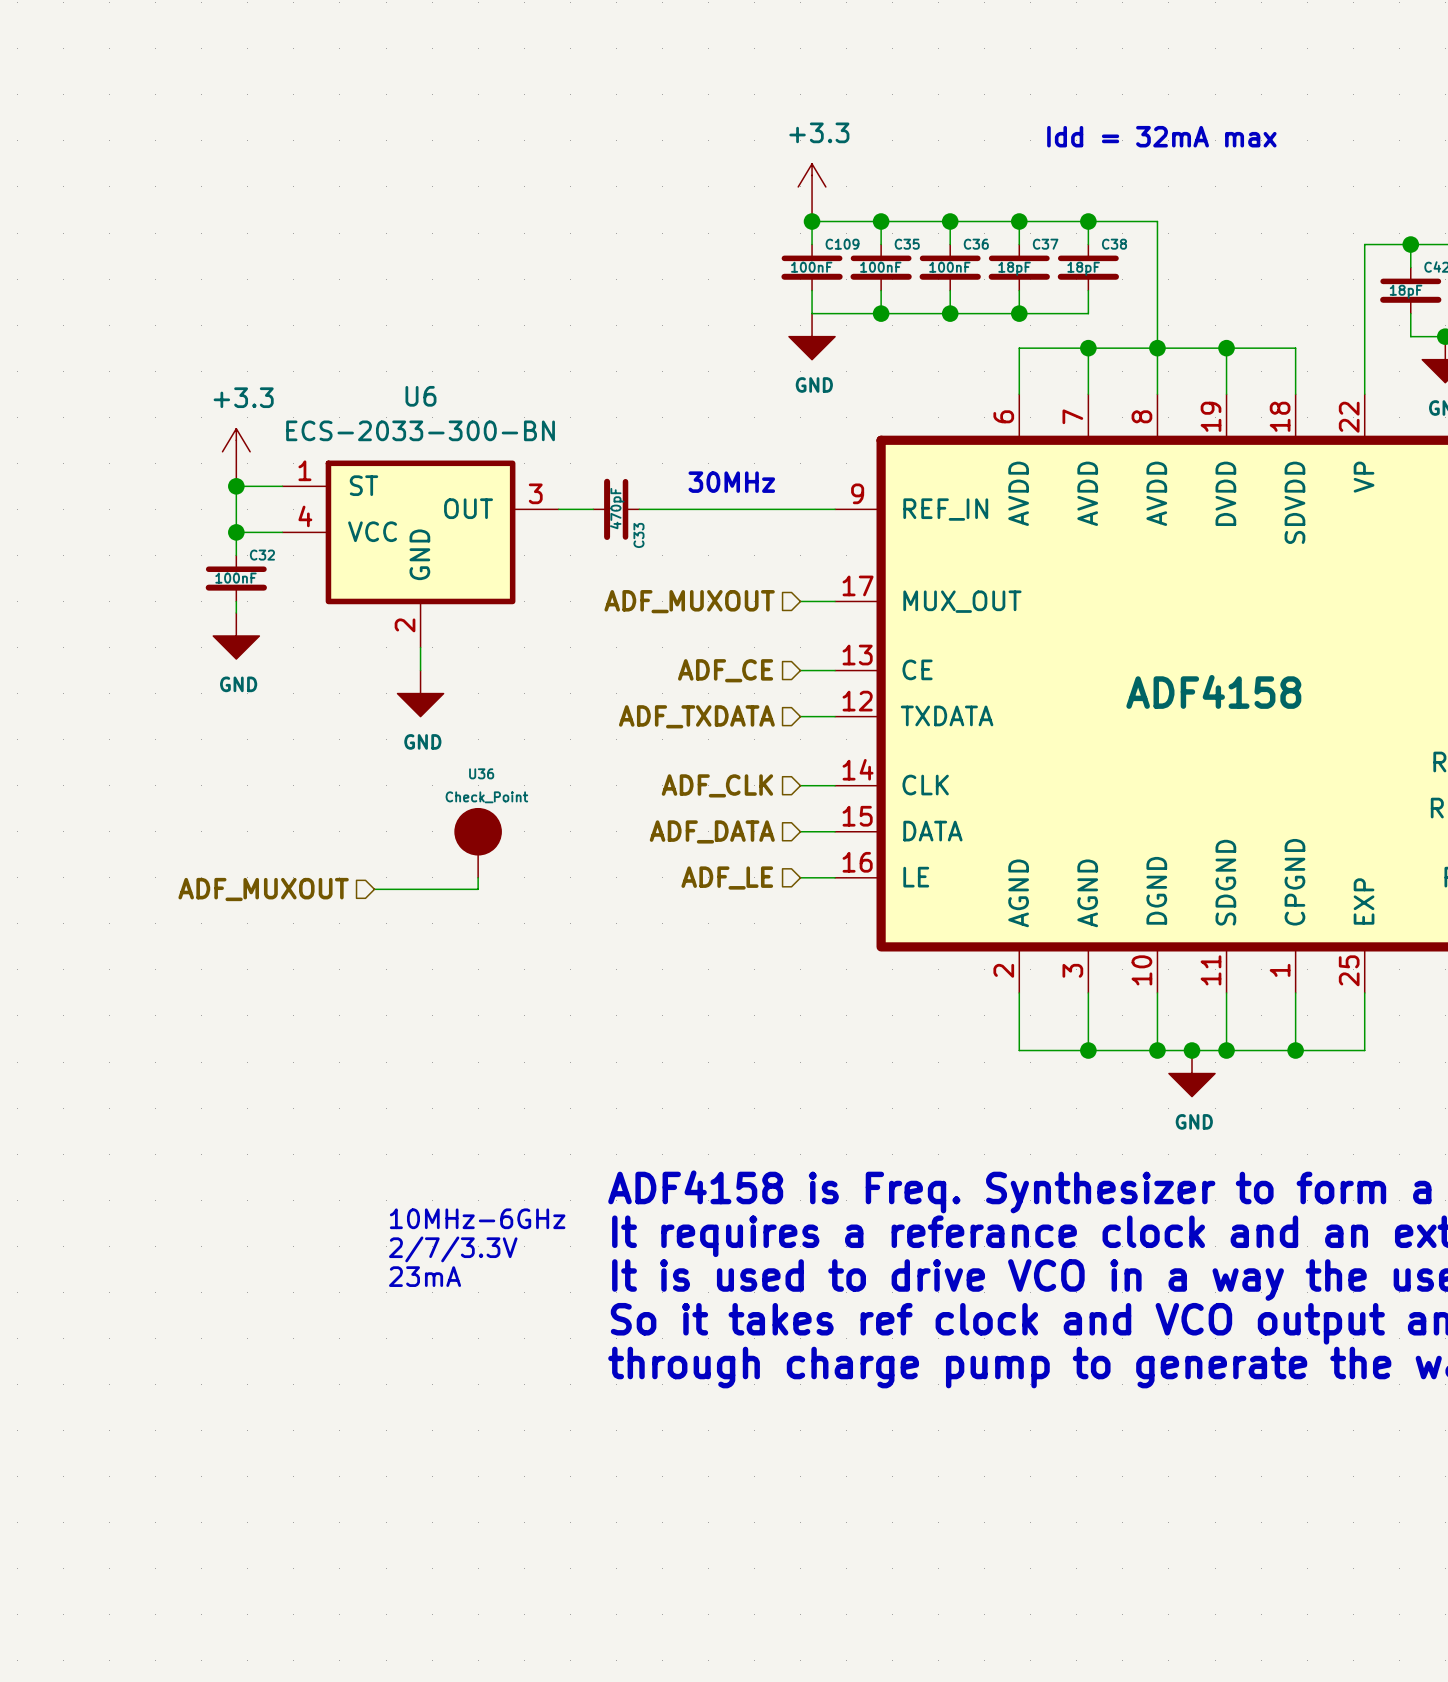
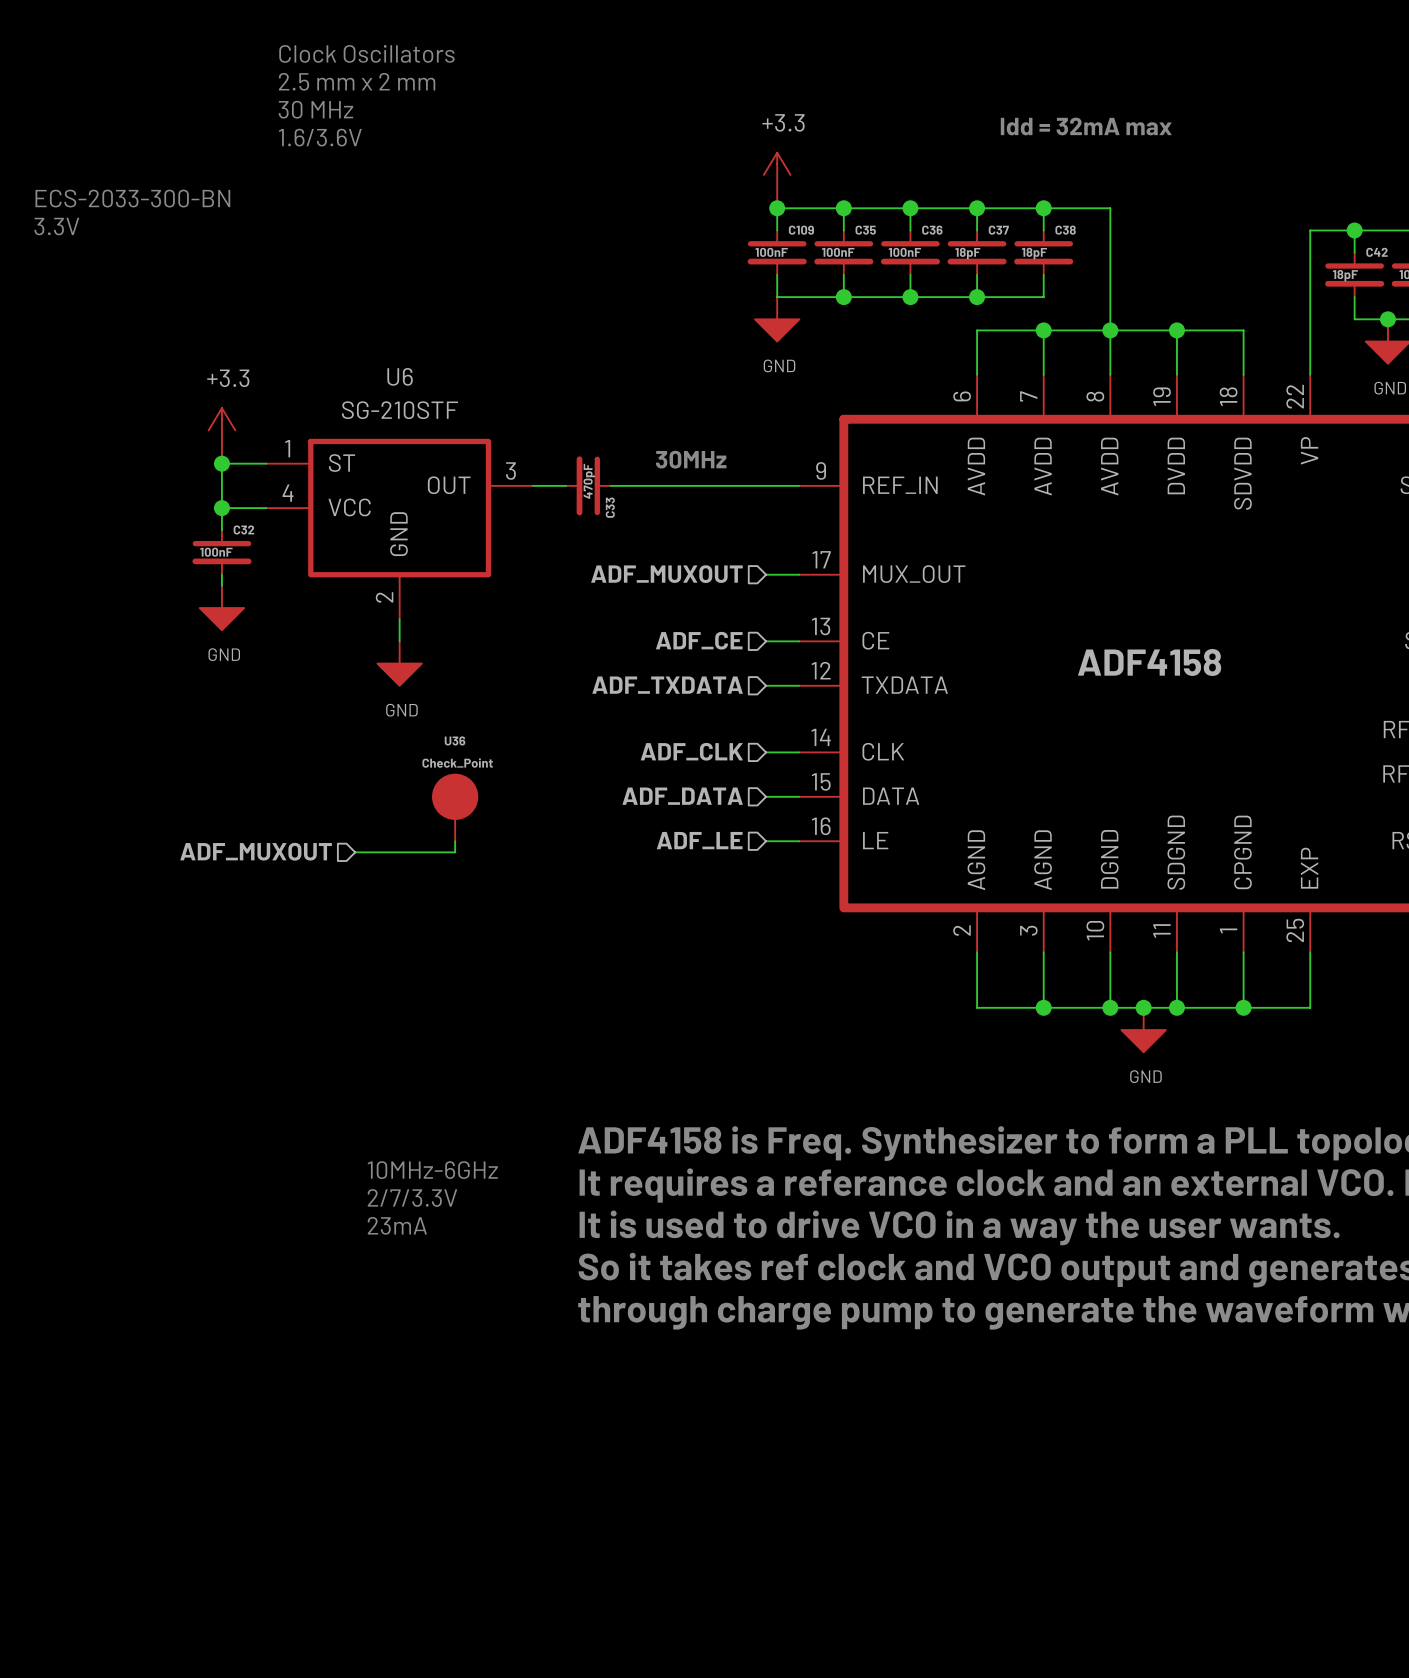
text: none -> Clock Oscillators (366, 53)
text: none -> 2.5 mm x 2 mm (357, 81)
text: none -> 30 MHz (315, 109)
text: none -> 1.6/3.6V (320, 137)
text: none -> ECS-2033-300-BN (132, 198)
text: none -> 3.3V (56, 226)
U6 value: ECS-2033-300-BN (420, 430) -> SG-210STF (400, 410)

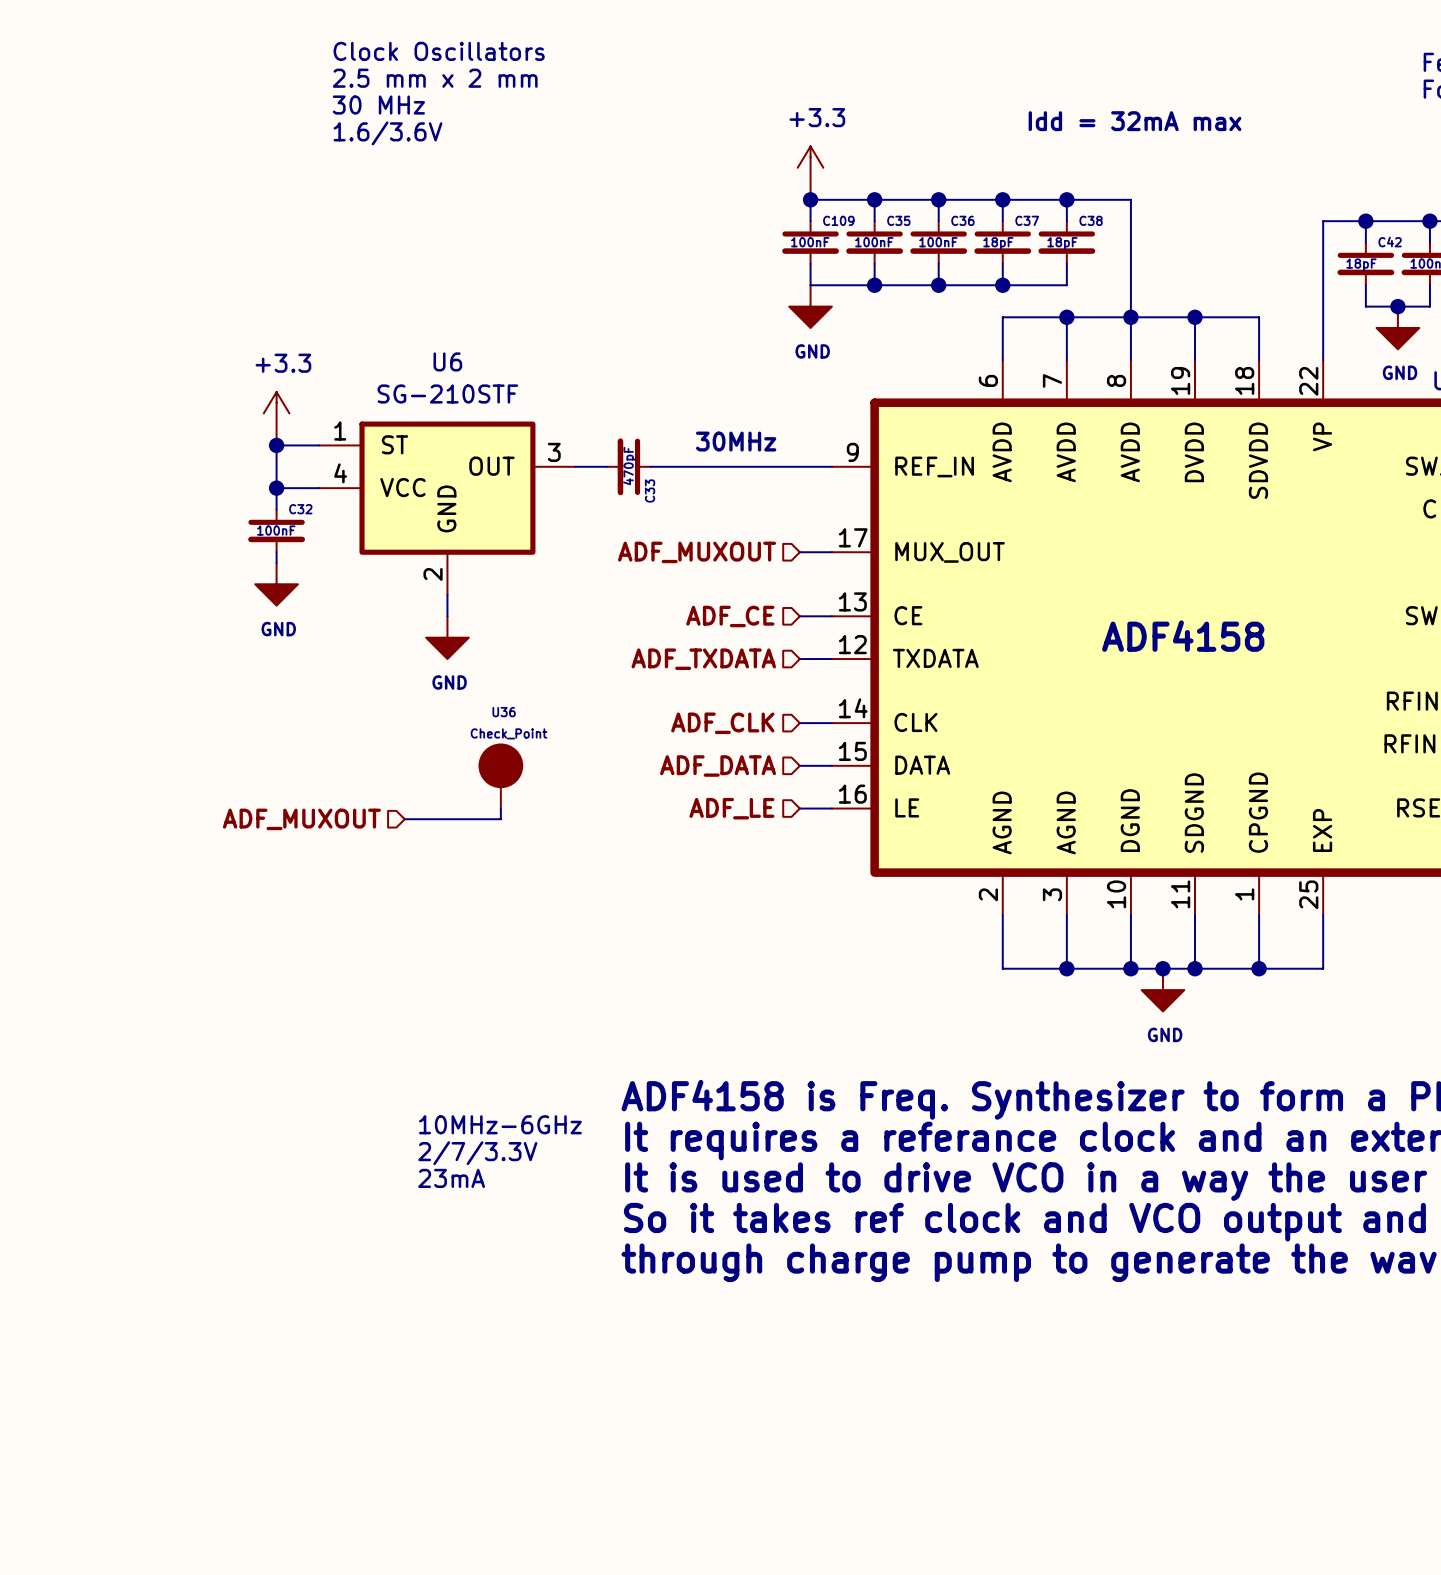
text: ECS-2033-300-BN (132, 198) -> none
text: 3.3V (56, 226) -> none

